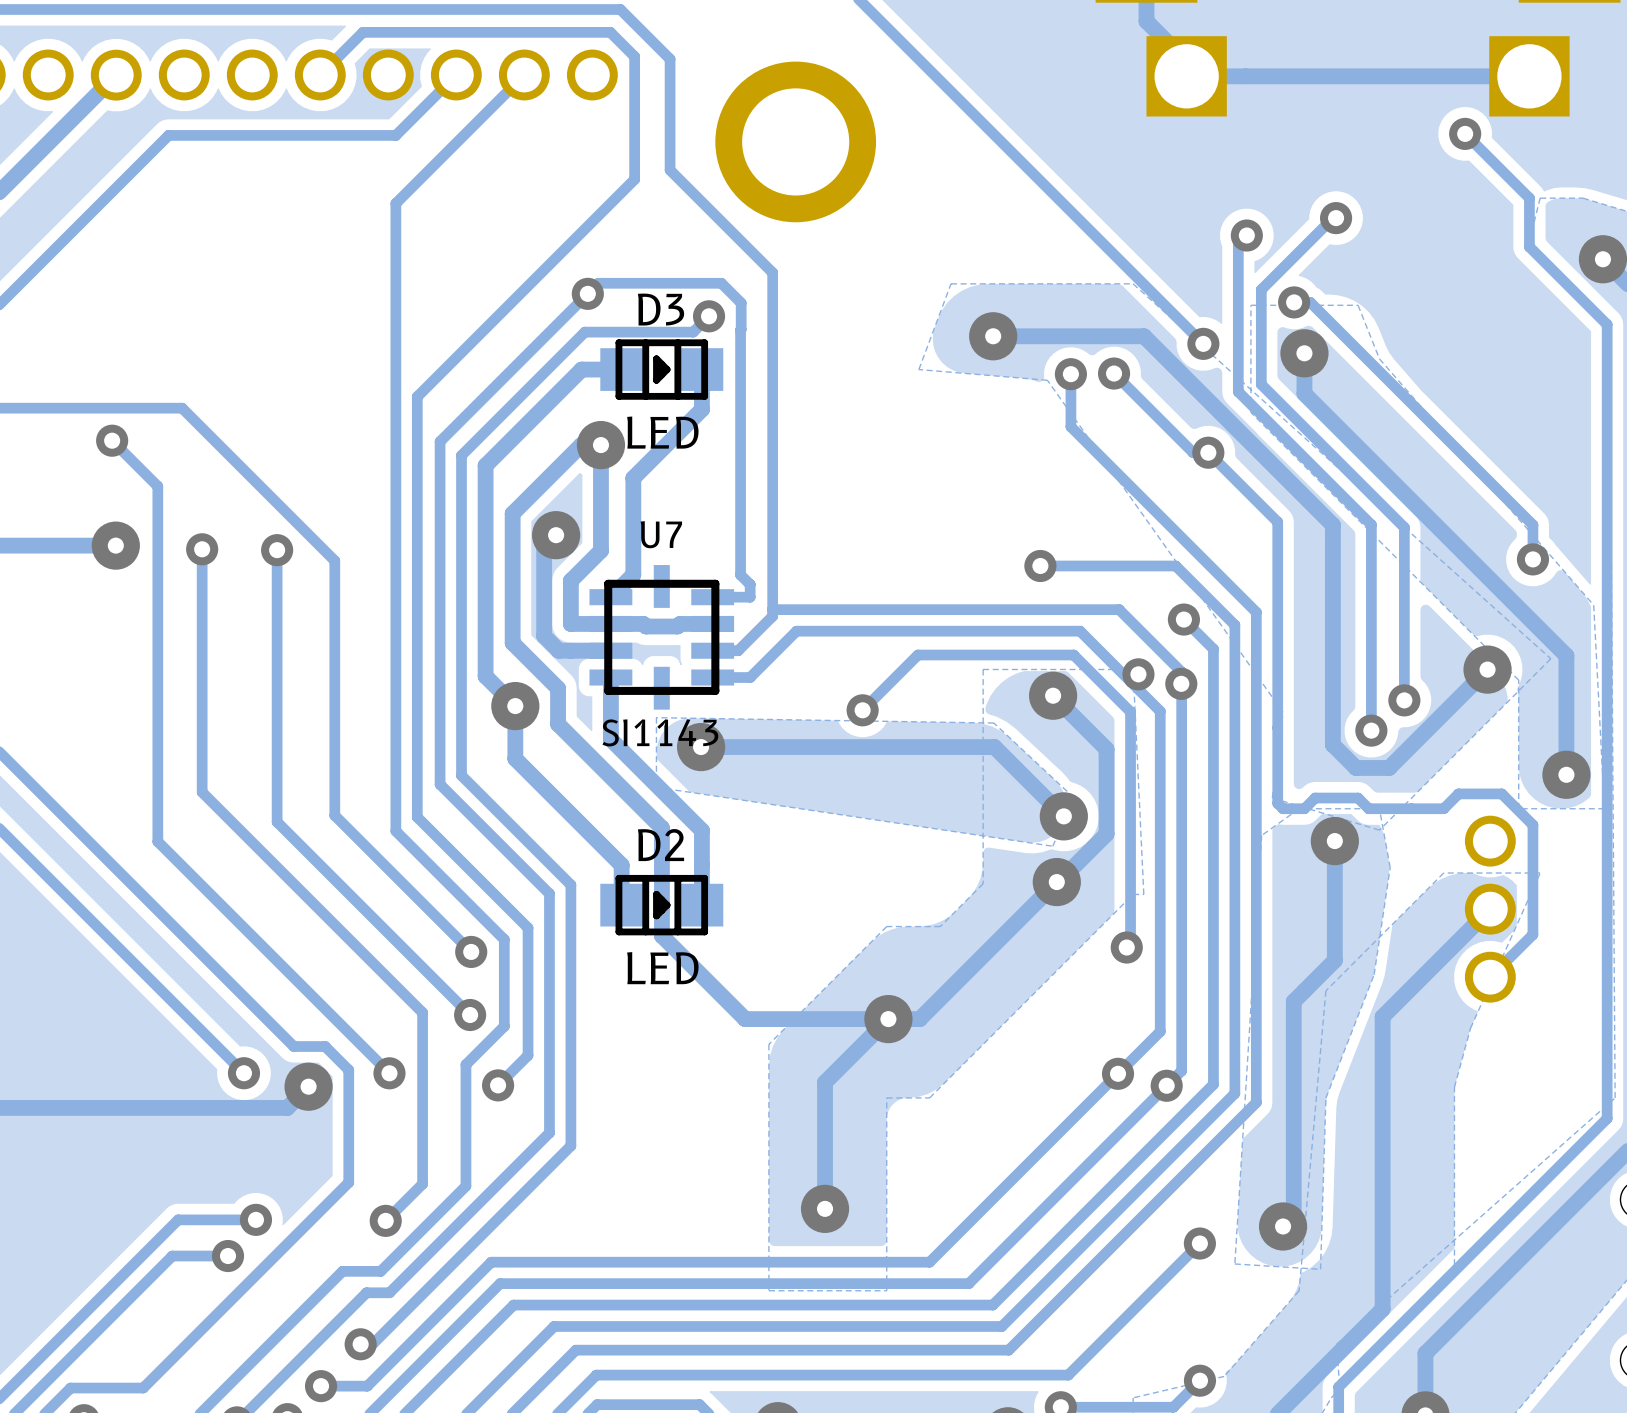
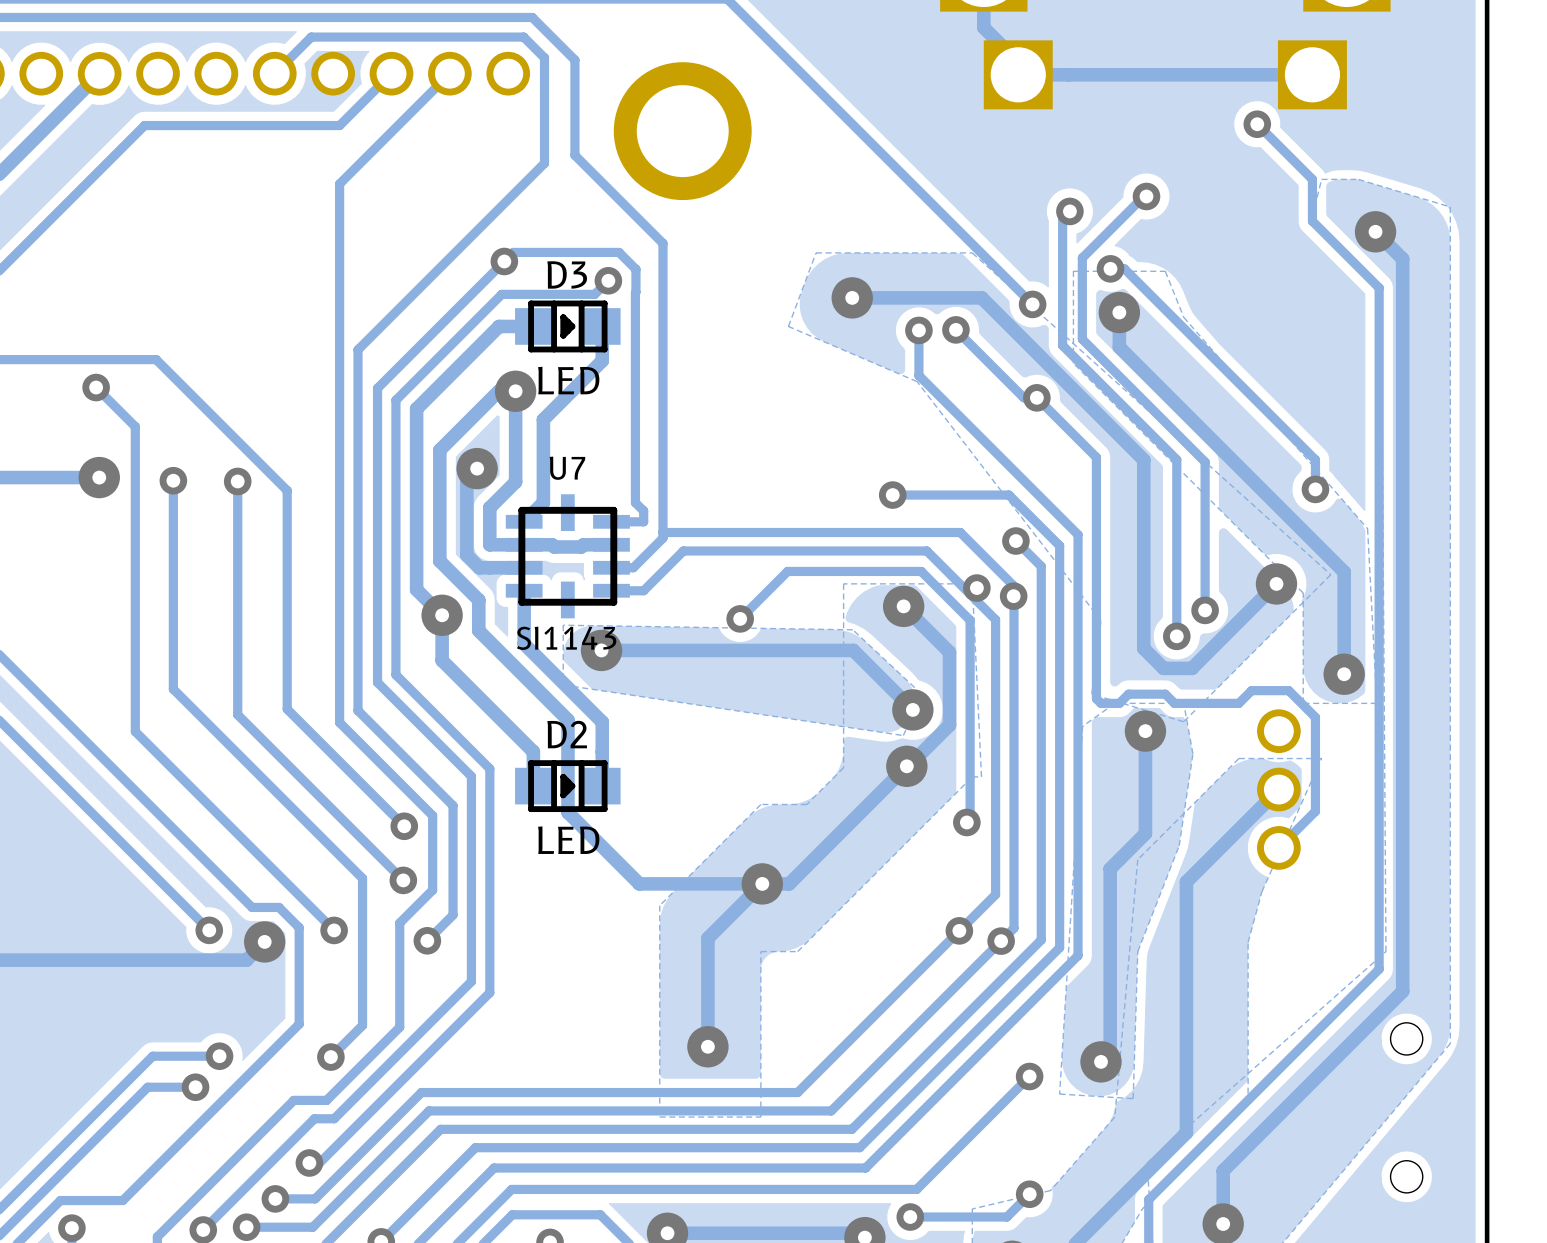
zone outline: (918, 369) (1047, 380) (1283, 712) -> (788, 326) (917, 381) (1101, 620)

